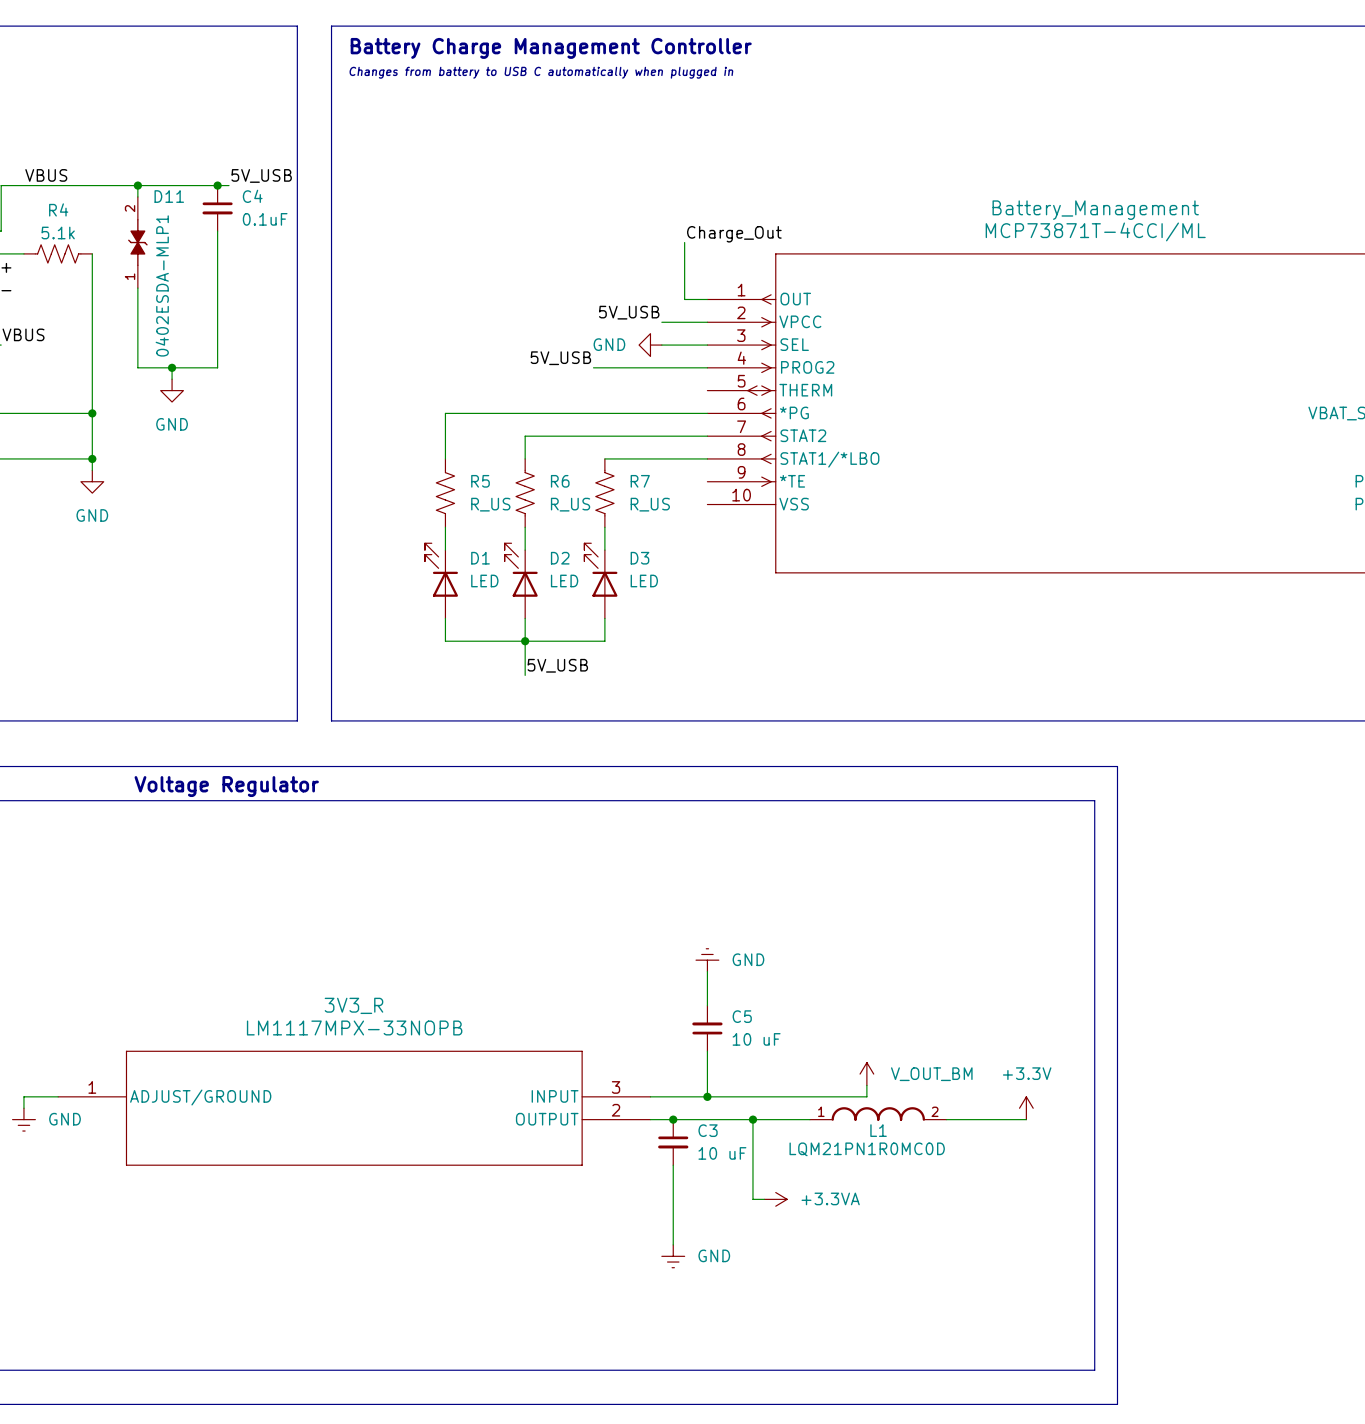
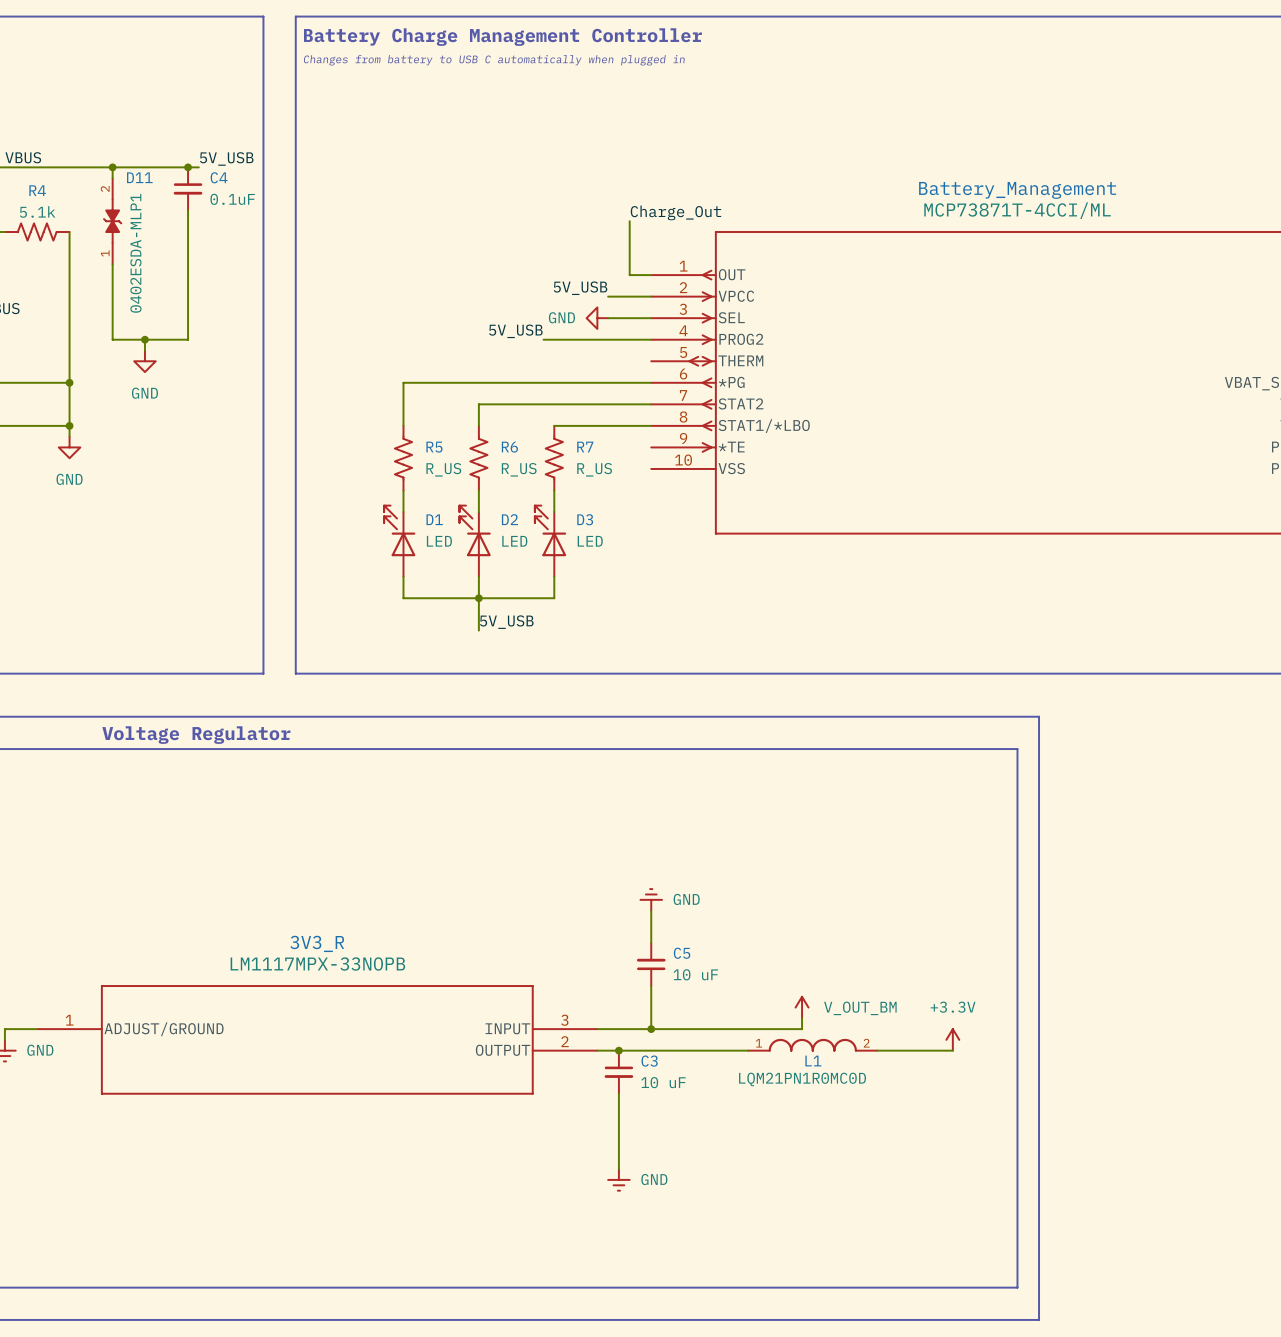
wire: (752, 1119) (752, 1199) (764, 1199) -> none
junction: (752, 1119) -> none
power symbol: +3.3VA (775, 1199) -> none

